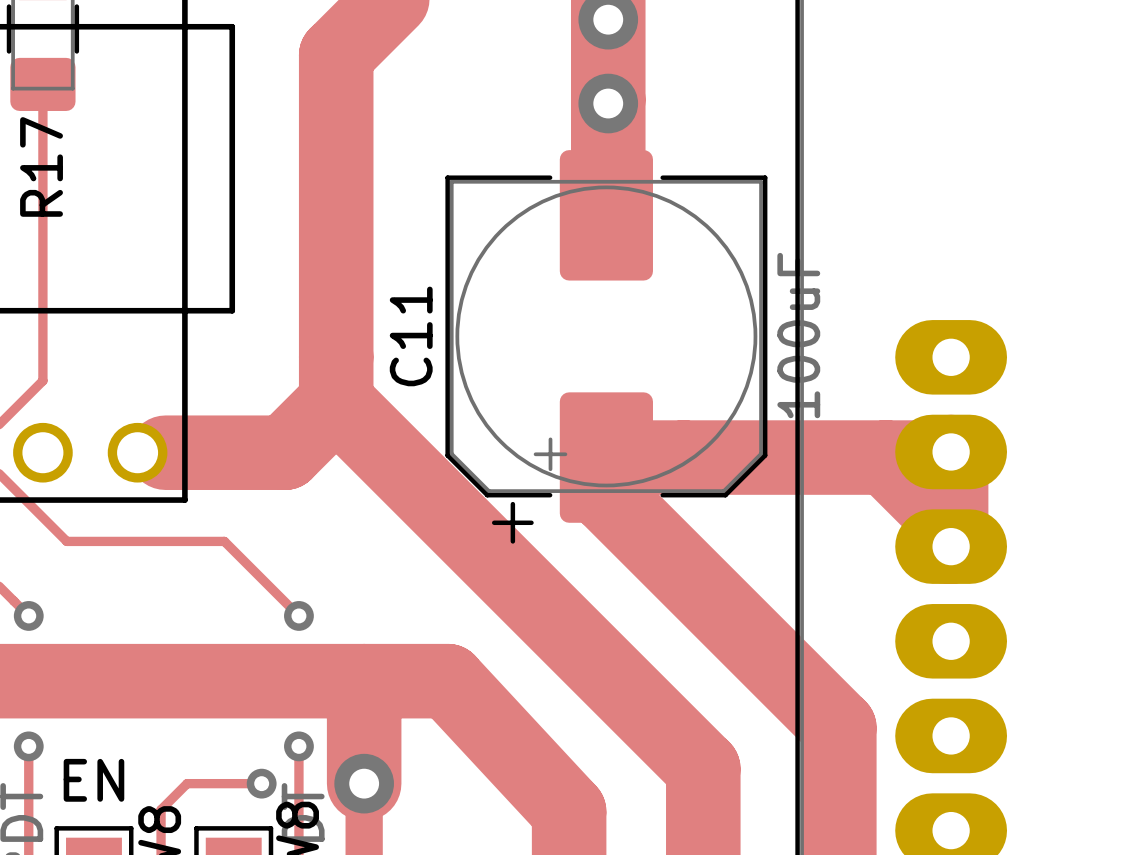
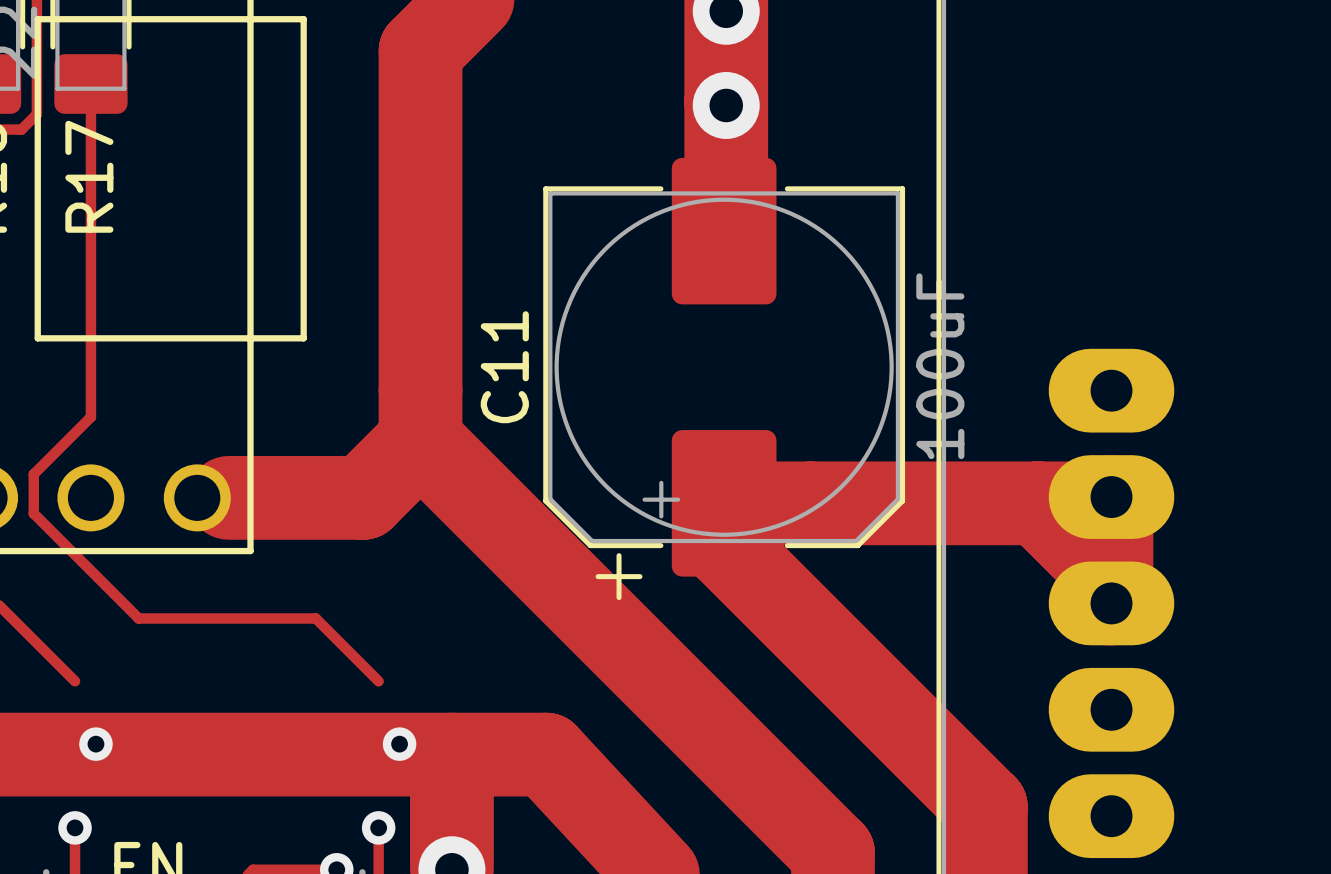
track: (66, 541) (224, 541) (243, 560) -> (117, 597) (138, 618) (315, 618)
via position: (28, 615) -> (95, 744)
via position: (298, 615) -> (399, 744)

